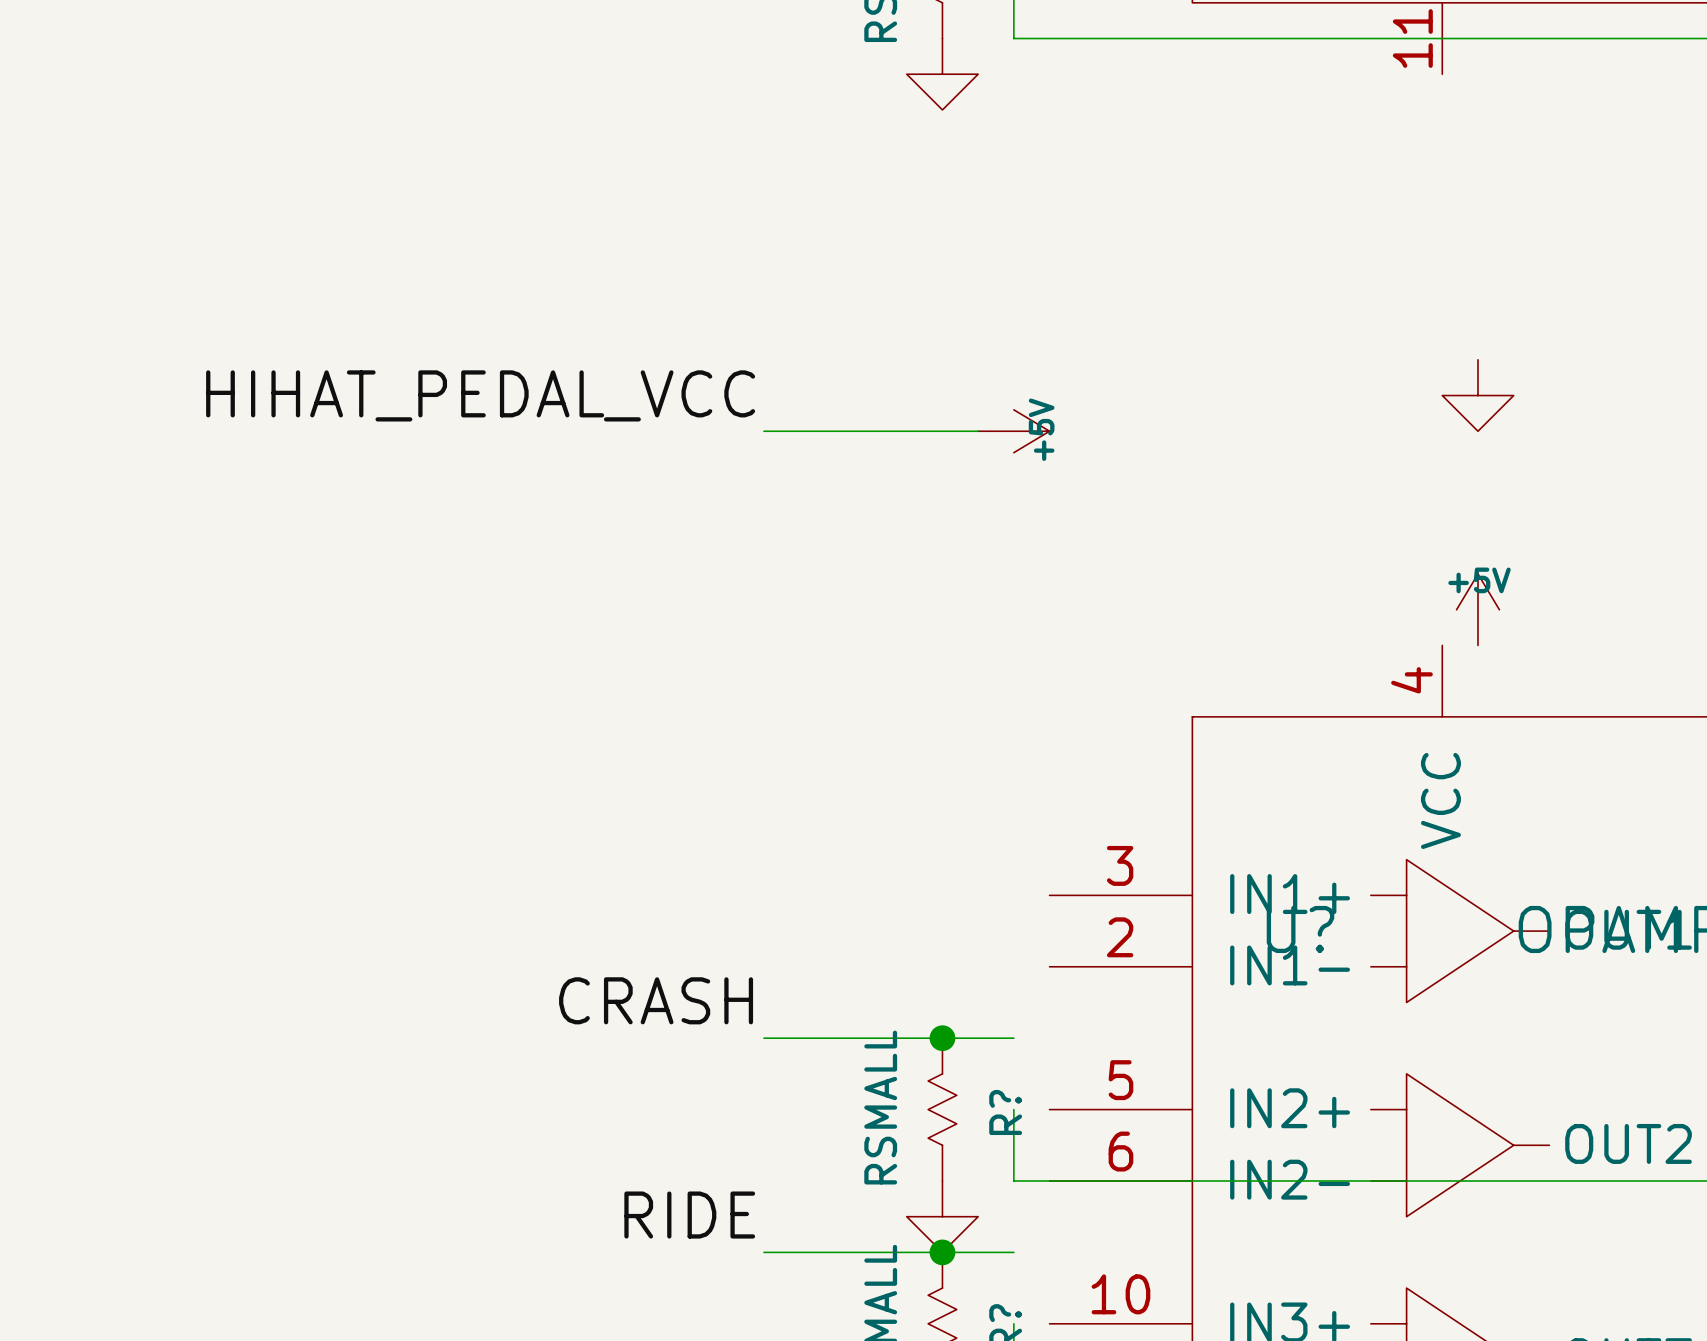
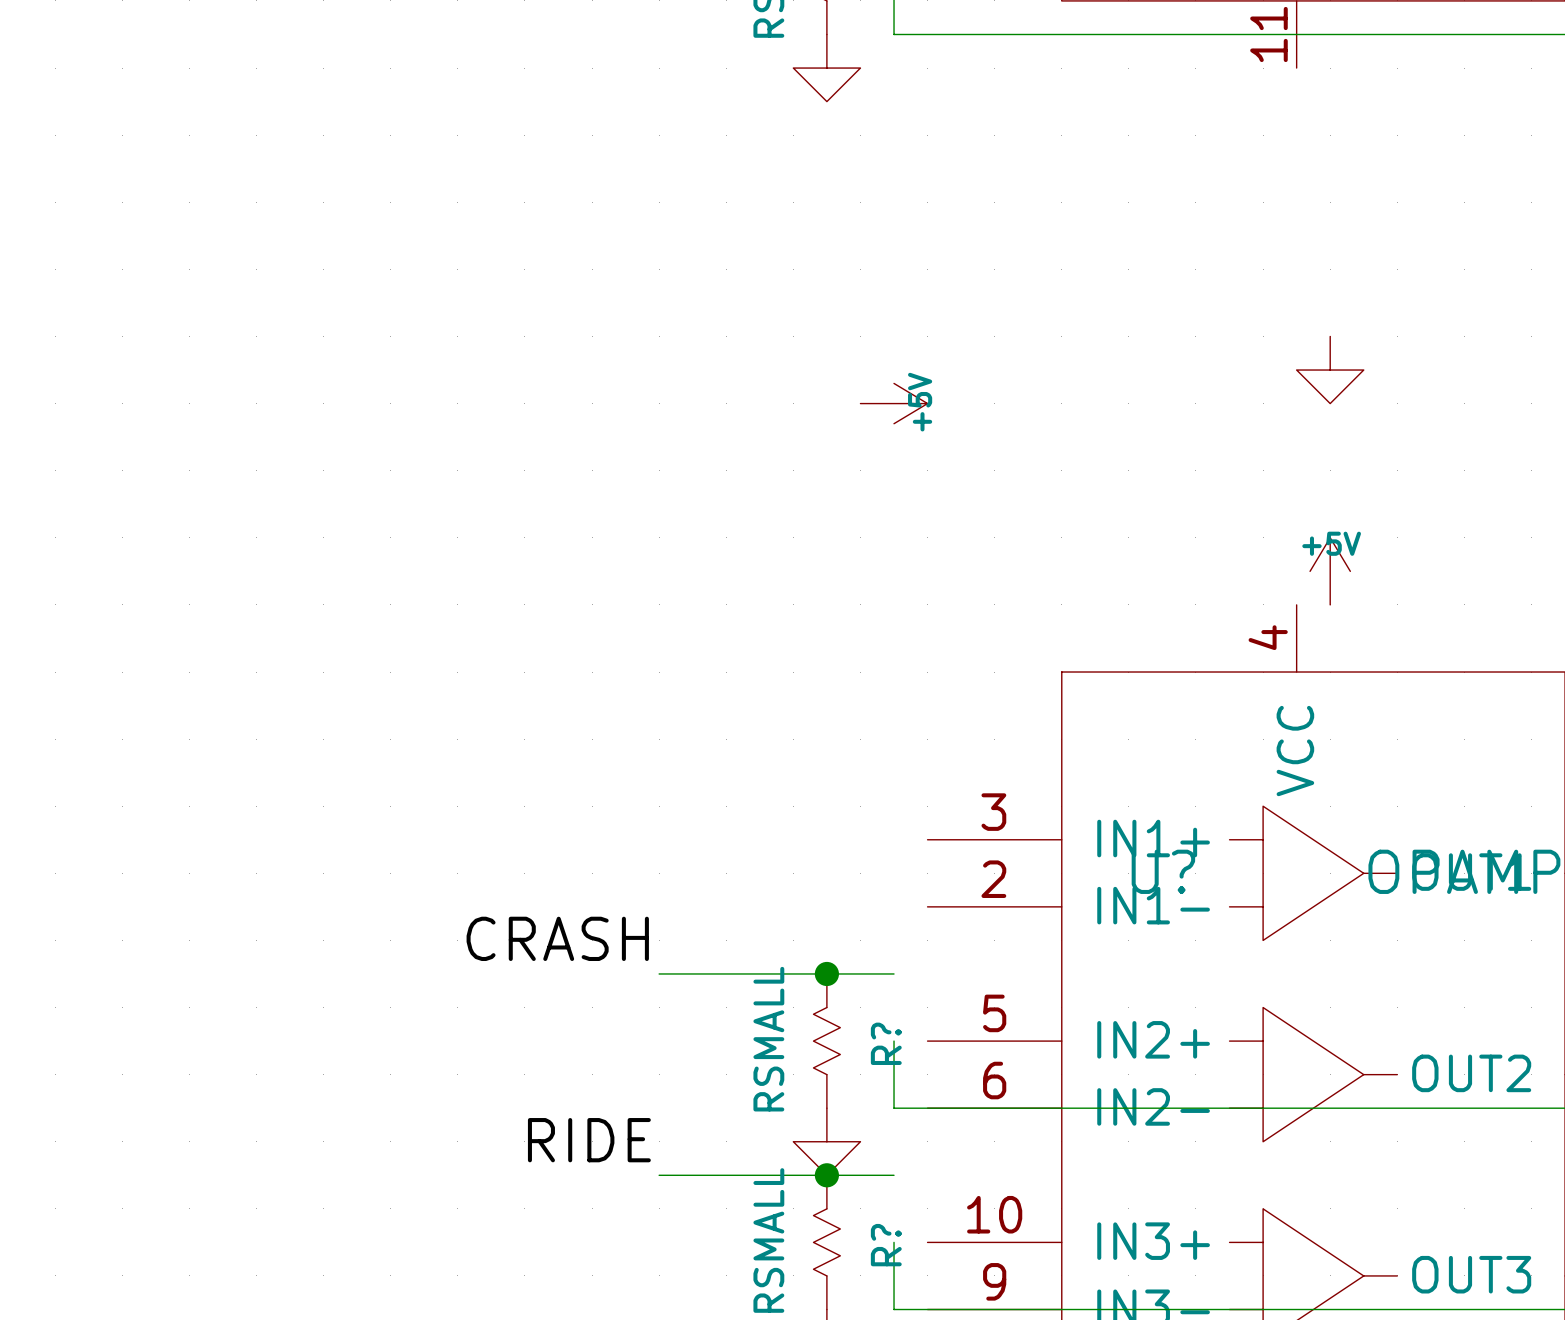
label: HIHAT_PEDAL_VCC (480, 395) -> none
wire: (763, 431) (978, 431) -> none

